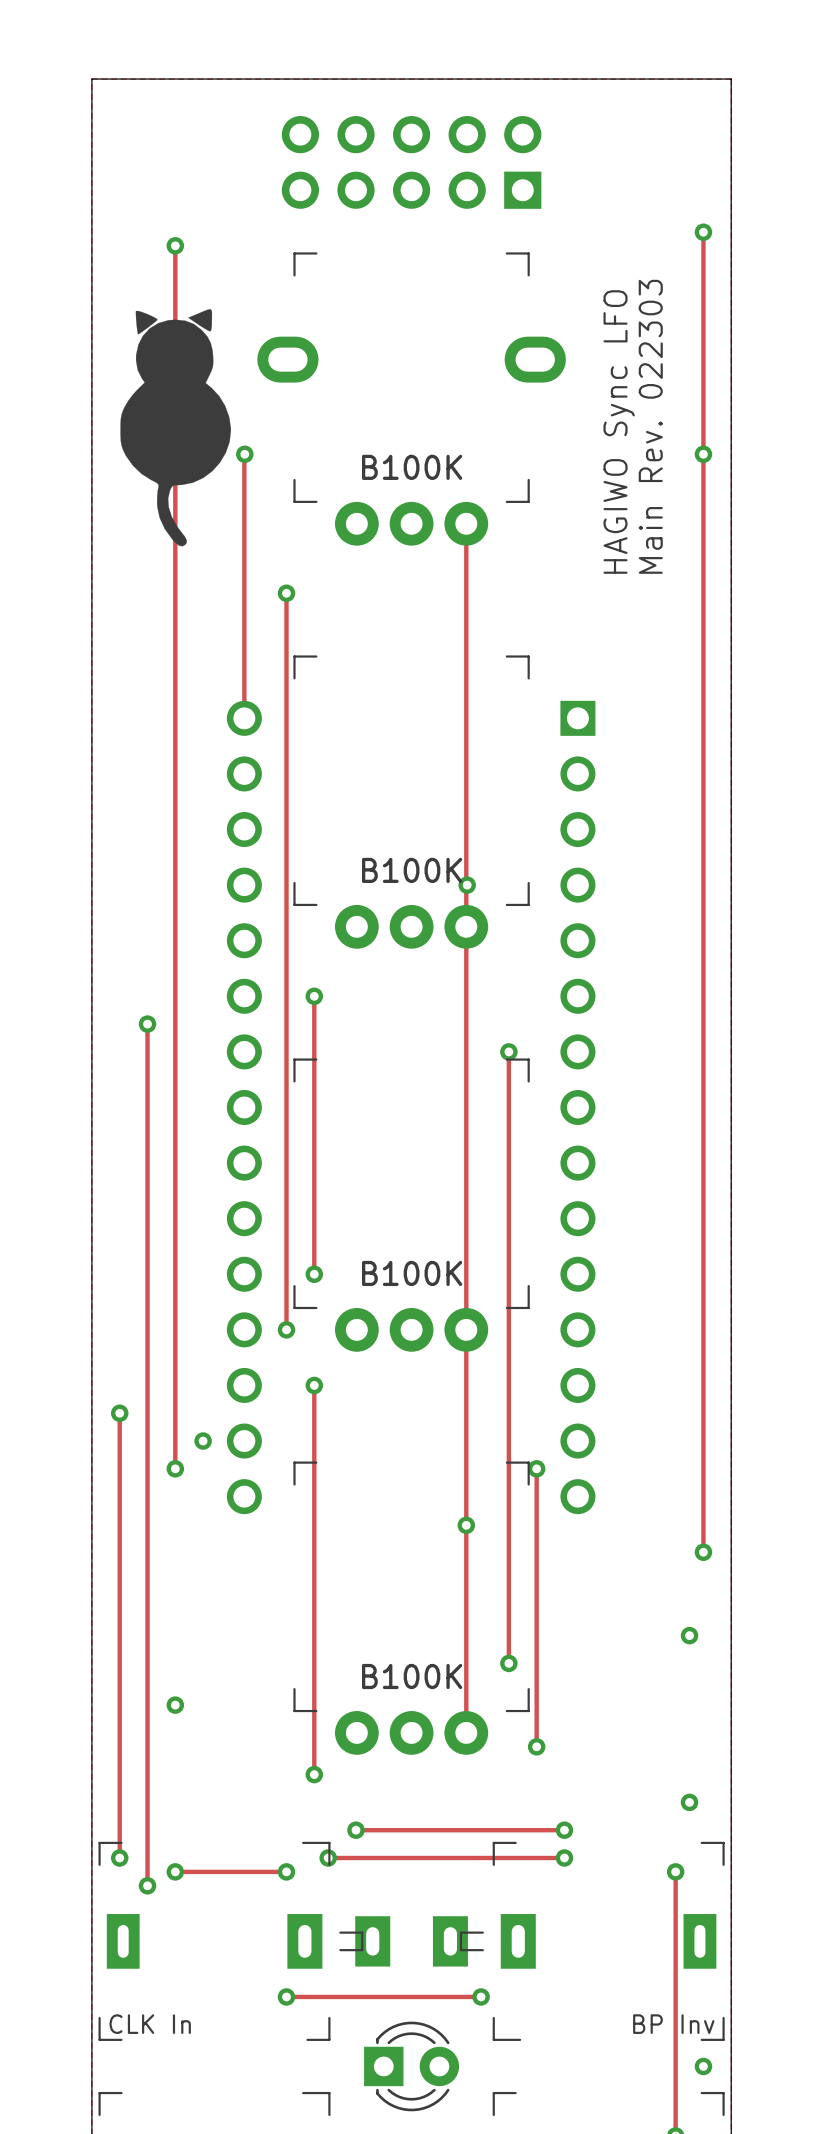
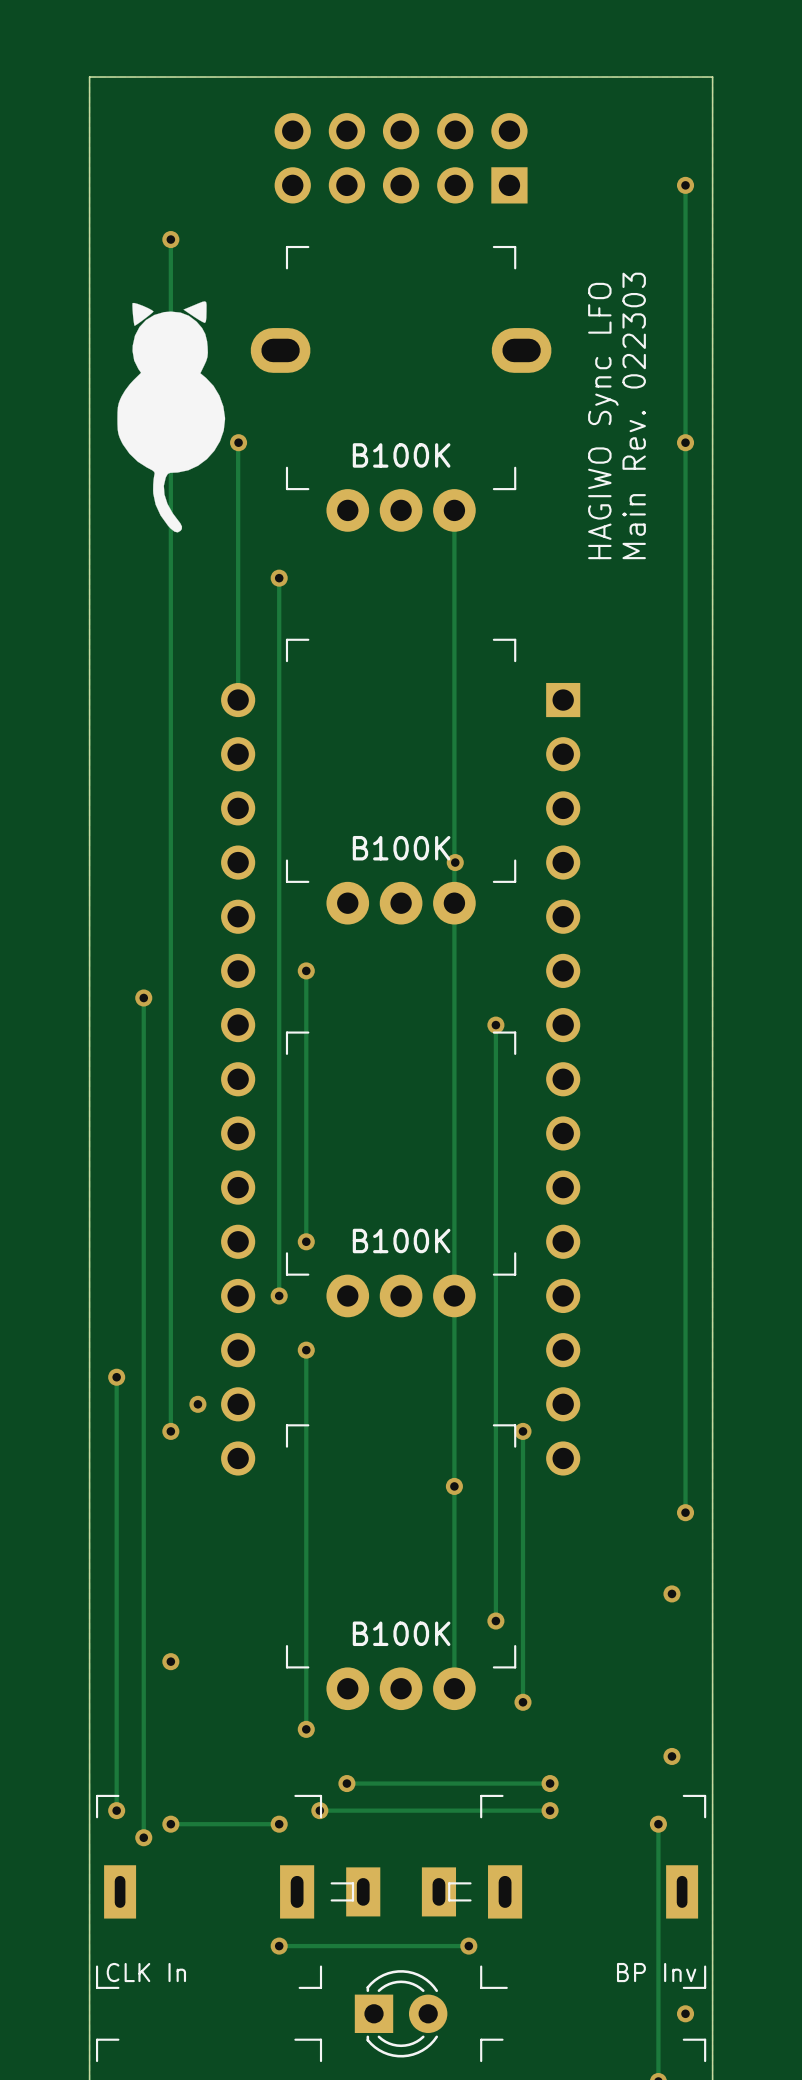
track: none -> (685, 185) (685, 226)
via position: (703, 232) -> (685, 185)

